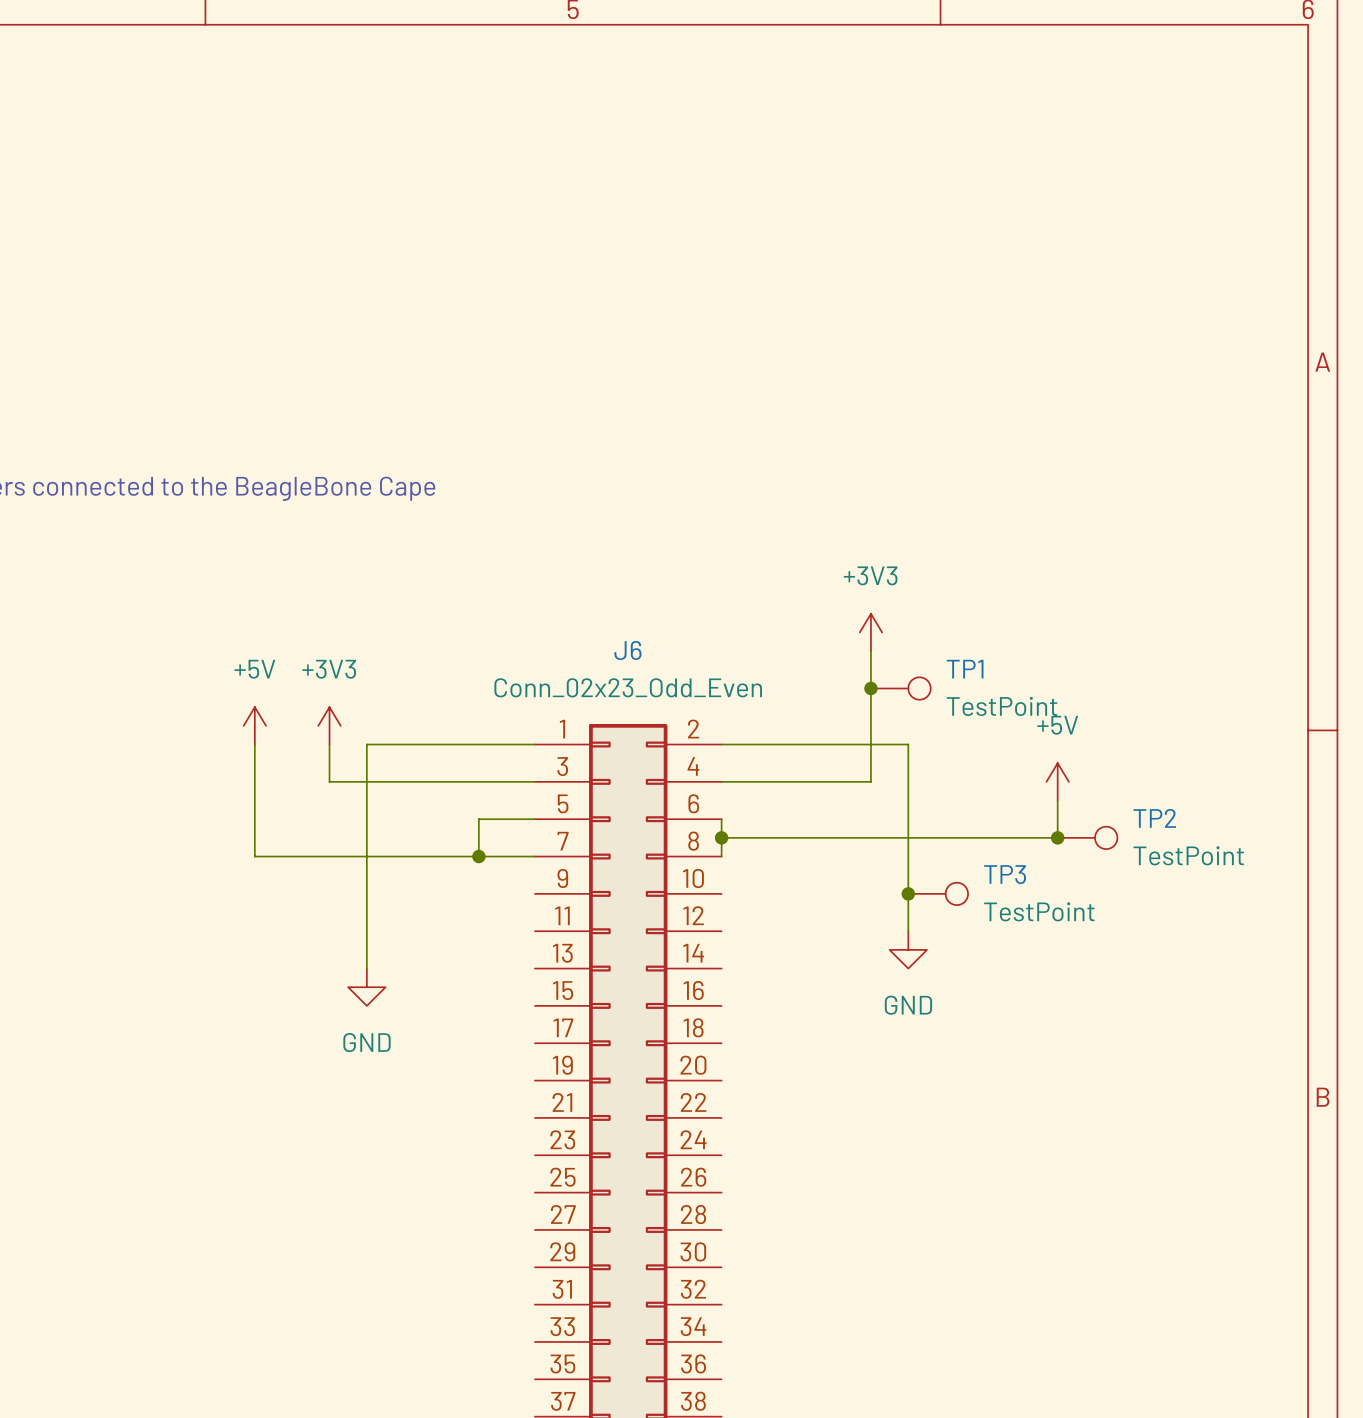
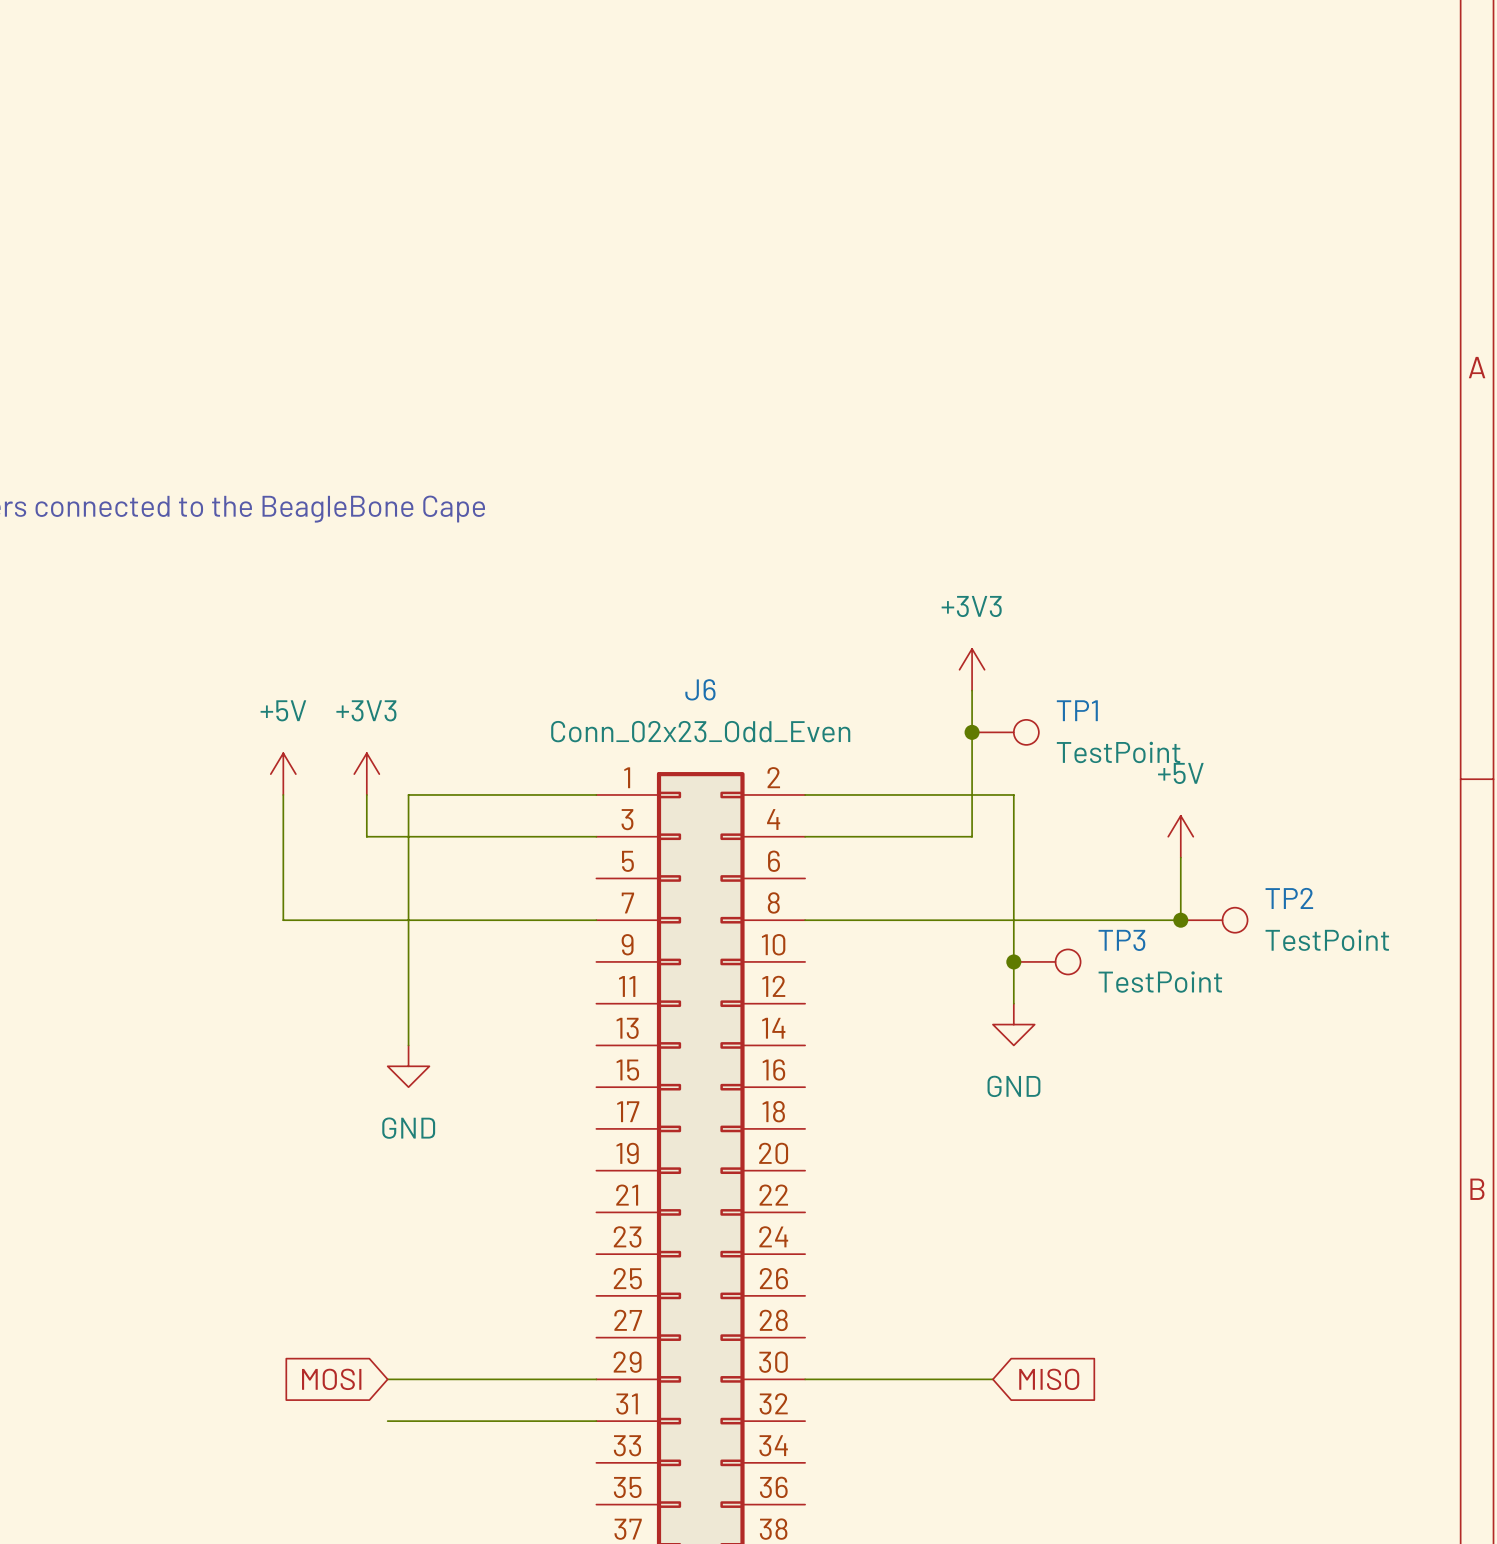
wire: (534, 819) (478, 819) (478, 856) -> none
wire: (721, 819) (721, 856) -> none
wire: (721, 837) (1057, 837) -> (805, 920) (1180, 920) (1180, 899)
junction: (721, 837) -> none
junction position: (1057, 837) -> (1180, 920)
TP2 position: (1087, 837) -> (1214, 920)
junction: (478, 856) -> none
global label: none -> MOSI (331, 1379)
wire: none -> (387, 1379) (596, 1379)
wire: none -> (805, 1379) (992, 1379)
global label: none -> MISO (1049, 1379)
wire: none -> (387, 1421) (596, 1421)

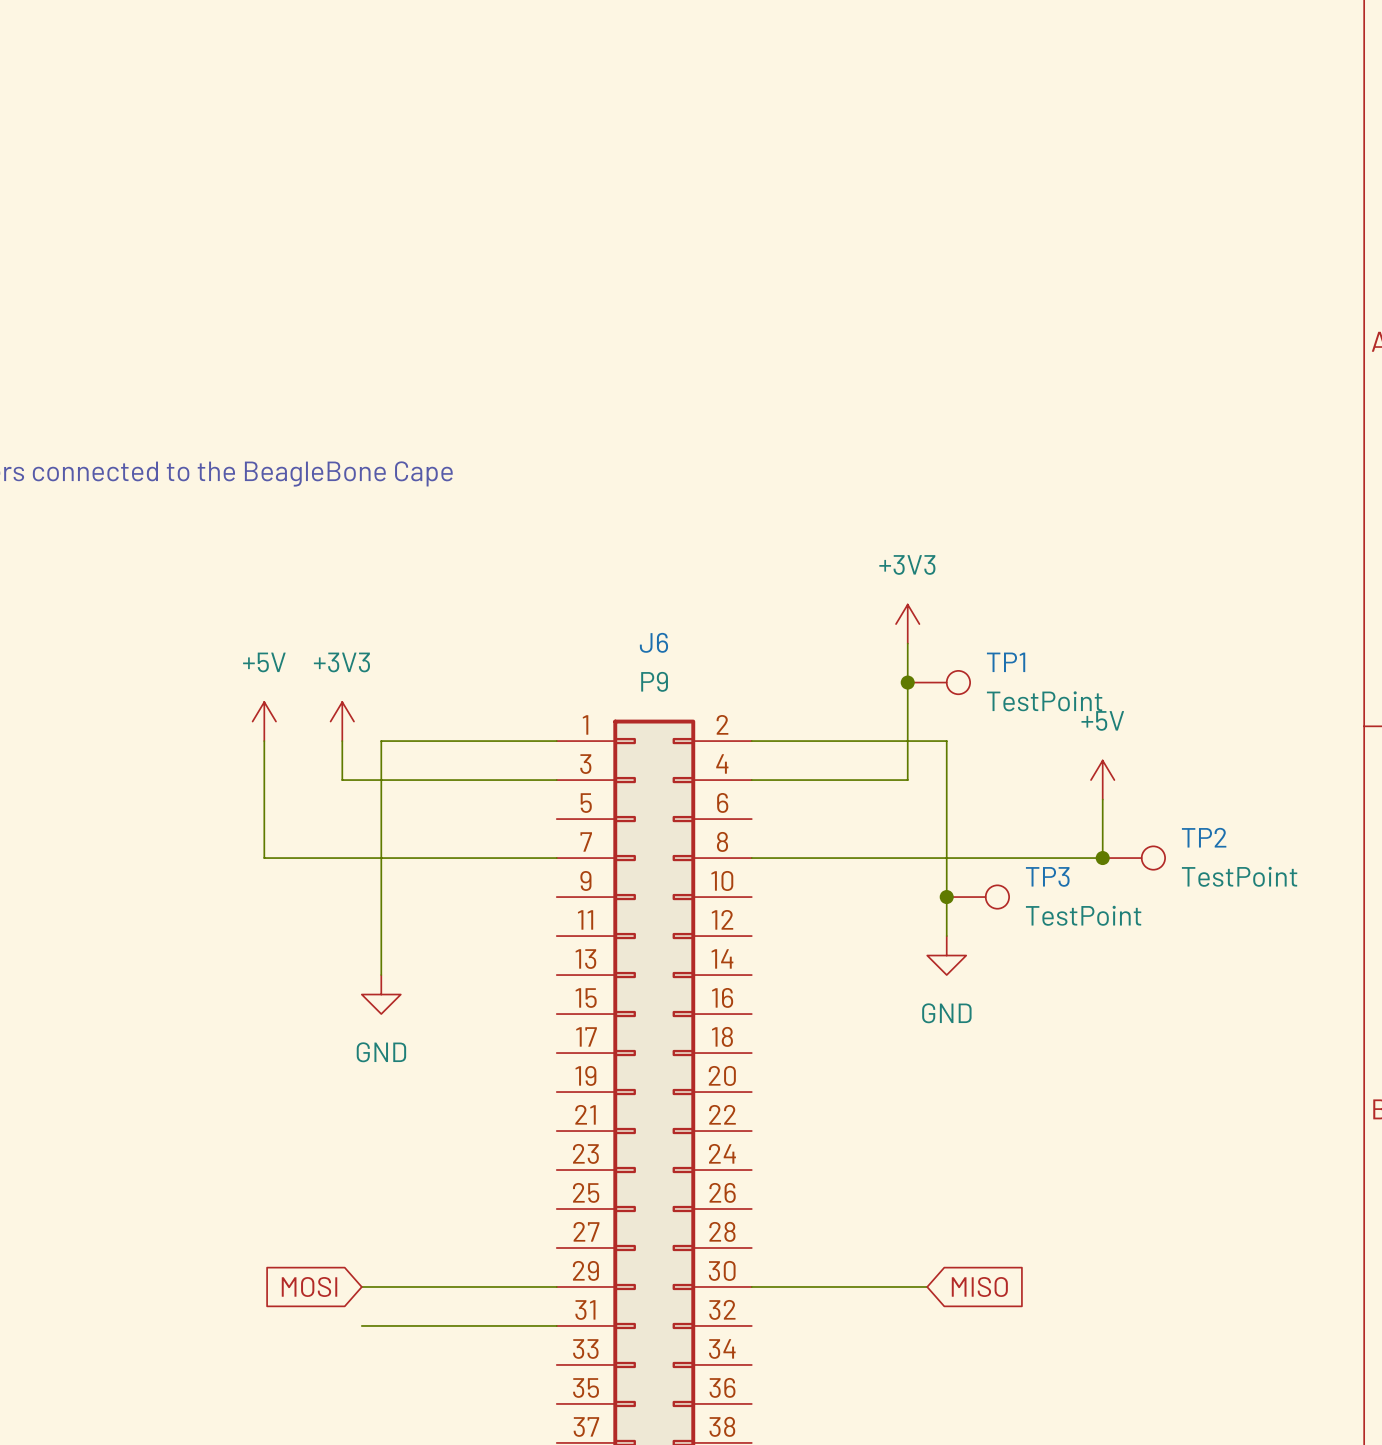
J6 value: Conn_02x23_Odd_Even (700, 731) -> P9 (654, 681)

